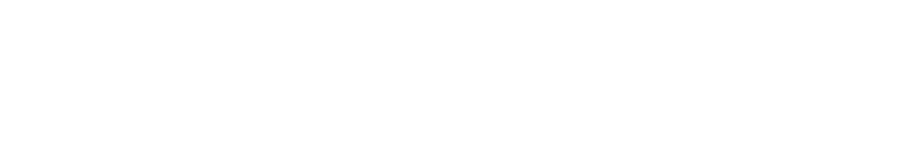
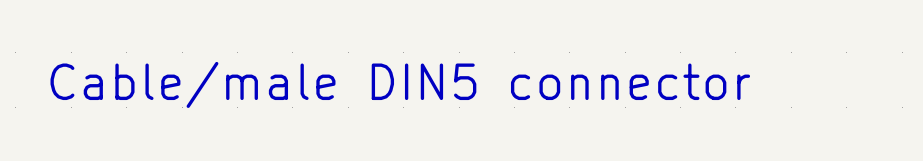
text: none -> Cable/male DIN5 connector (400, 84)

